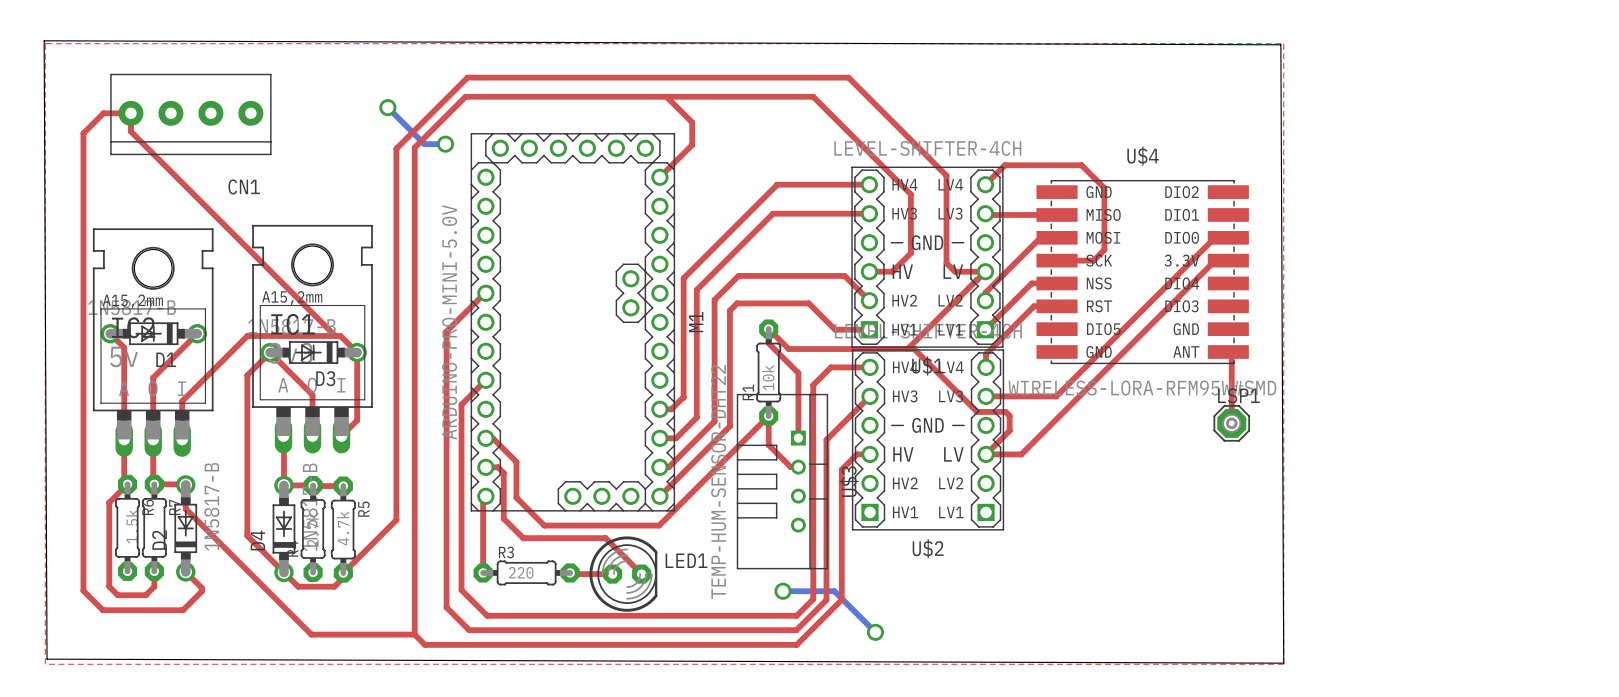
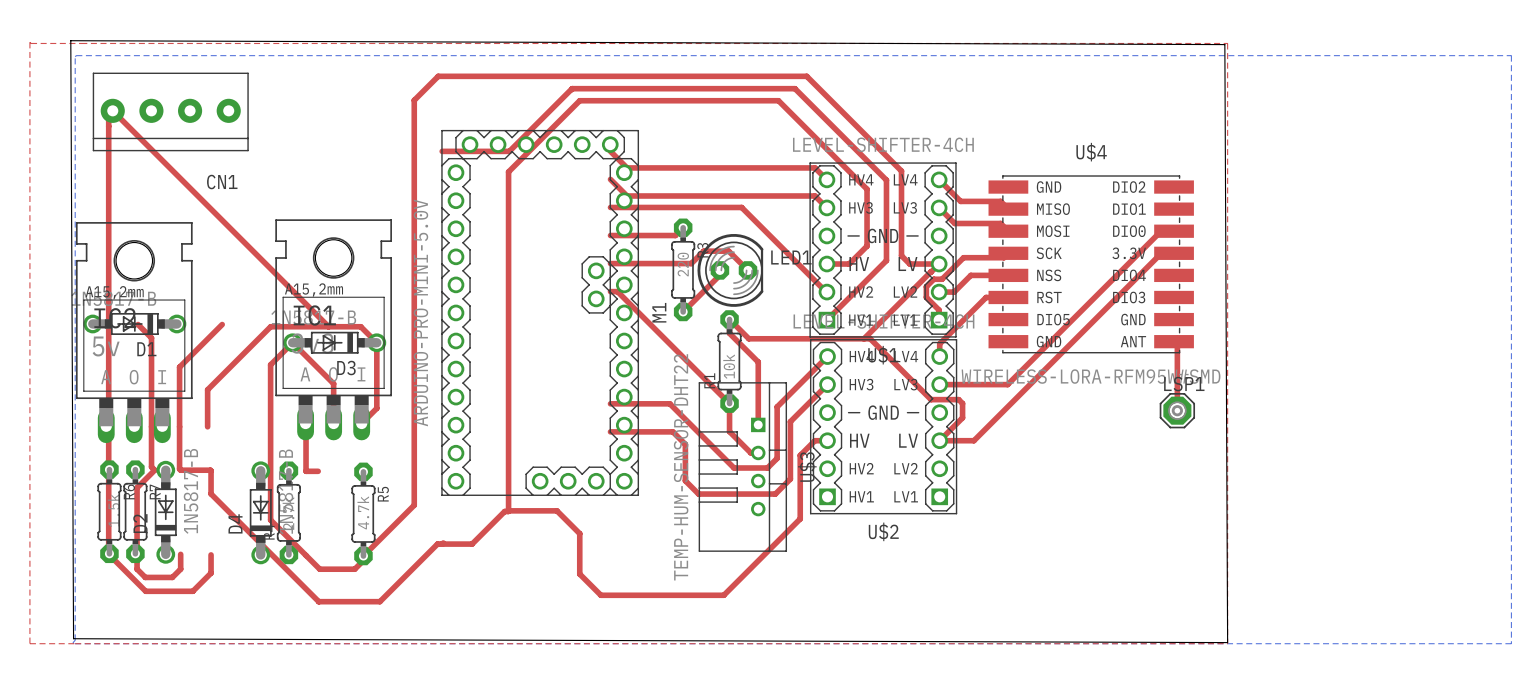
board edge: (1280, 44) (44, 40) (47, 659) (1283, 663) -> (1224, 44) (70, 40) (73, 638) (1227, 642)
bottom zone outline: none -> (76, 55) (73, 643) (1511, 643) (1511, 55) (76, 55)
top track: (666, 96) (692, 122) (692, 144) (659, 177) -> none
top track: (442, 102) (396, 148) (396, 519) (343, 573) (343, 577) (334, 586) (298, 586) (247, 535) (247, 375) (270, 352) (312, 394) (312, 436) -> (414, 100) (414, 505) (363, 556) (363, 560) (354, 569) (319, 569) (270, 520) (270, 364) (292, 342) (333, 383) (333, 423)
top track: (819, 102) (813, 96) (465, 96) (414, 147) (414, 634) -> (778, 100) (579, 100) (508, 171) (508, 510)
bottom track: (387, 107) (424, 144) (445, 144) -> none
via: (387, 107) -> none
via: (445, 144) -> none
top track: (869, 184) (777, 184) (683, 278) (683, 397) (671, 409) (659, 409) -> (826, 179) (815, 167) (627, 167) (610, 151)
top track: (985, 184) (1004, 165) (1081, 165) (1104, 188) (1104, 249) (1093, 260) (1057, 260) -> (939, 179) (960, 201) (1000, 201) (1008, 209)
top track: (869, 213) (773, 213) (696, 289) (696, 417) (676, 438) (659, 438) -> (826, 207) (815, 195) (627, 195) (610, 179)
top track: (986, 214) (1057, 214) -> (940, 209) (954, 223) (1000, 223) (1008, 231)
top track: none -> (683, 227) (675, 235) (610, 235)
top track: (1057, 237) (1040, 237) (985, 292) (985, 300) -> none
top track: none -> (1008, 253) (1003, 257) (963, 257) (942, 279) (933, 279) (926, 286) (926, 297) (939, 310) (939, 320)
top track: none -> (610, 263) (691, 263) (703, 251) (728, 251) (747, 270)
top track: none -> (719, 270) (719, 275) (683, 311)
top track: (1031, 283) (985, 329) -> (983, 275) (970, 275) (954, 292) (939, 292)
top track: (485, 293) (489, 288) (446, 331) (446, 607) (469, 630) (796, 630) (826, 600) (826, 439) (831, 434) -> (610, 431) (672, 431) (685, 444) (685, 480) (698, 494) (775, 494) (790, 479) (790, 421)
top track: (869, 300) (844, 275) (738, 275) (714, 299) (714, 421) (668, 467) (659, 467) -> (826, 292) (741, 207) (610, 207)
top track: (869, 329) (835, 329) (808, 303) (737, 303) (729, 310) (729, 426) (659, 496) -> (826, 320) (886, 260) (886, 180) (795, 88) (572, 88) (509, 151) (442, 151)
top track: (110, 333) (124, 347) (124, 481) (127, 484) (109, 502) (109, 586) (117, 595) (145, 595) (154, 586) (154, 571) -> (138, 324) (151, 338) (151, 467) (154, 470) (137, 487) (137, 569) (145, 577) (172, 577) (180, 569) (180, 554)
top track: (197, 333) (153, 377) (153, 483) (185, 484) (185, 508) (311, 634) (414, 634) -> none
top track: none -> (222, 324) (179, 367) (179, 469) (210, 470) (211, 493) (318, 601)
top track: (335, 336) (130, 131) (130, 113) (103, 113) (83, 133) (83, 590) (102, 610) (183, 610) (201, 591) (201, 588) (185, 571) -> none
top track: none -> (328, 326) (112, 110) (108, 114) (108, 554) (145, 591) (192, 591) (211, 573) (211, 554)
IC1 position: (312, 339) -> (333, 329)
D3 position: (313, 352) -> (334, 342)
top track: (870, 367) (830, 367) (813, 385) (813, 599) (796, 615) (487, 615) (461, 590) (461, 404) (485, 380) -> (827, 356) (777, 406) (777, 458) (767, 468) (734, 468) (669, 403) (610, 403)
top track: (768, 416) (659, 525) (544, 525) (516, 497) (516, 461) (492, 438) (485, 438) -> (729, 403) (617, 291) (610, 291)
top track: (283, 436) (283, 485) (330, 486) -> (305, 423) (306, 471)
top track: (341, 436) (357, 420) (357, 352) (340, 336) (247, 336) (182, 401) (182, 439) -> (361, 423) (376, 408) (376, 342) (360, 326) (270, 326) (207, 389) (207, 426)
top track: (485, 467) (498, 467) (503, 473) (503, 518) (523, 538) (605, 538) (641, 574) -> none
top track: (485, 496) (483, 499) (483, 572) -> none
top track: none -> (508, 510) (504, 511) (472, 544) (442, 544) (443, 542)
R5 position: (343, 529) -> (363, 513)
top track: (841, 535) (841, 599) (796, 644) (424, 644) (414, 634) -> (800, 518) (723, 595) (600, 595) (579, 574) (579, 533) (556, 510) (508, 510)
top track: none -> (442, 544) (437, 544) (379, 601) (318, 601)
R3 rotation: 0° (526, 572) -> 90° clockwise (683, 269)
R3 position: (526, 572) -> (683, 269)
top track: (570, 572) (612, 574) -> none
LED1 position: (623, 574) -> (730, 270)
bottom track: (782, 591) (834, 591) (875, 632) -> none
via: (782, 591) -> none
via: (875, 632) -> none

